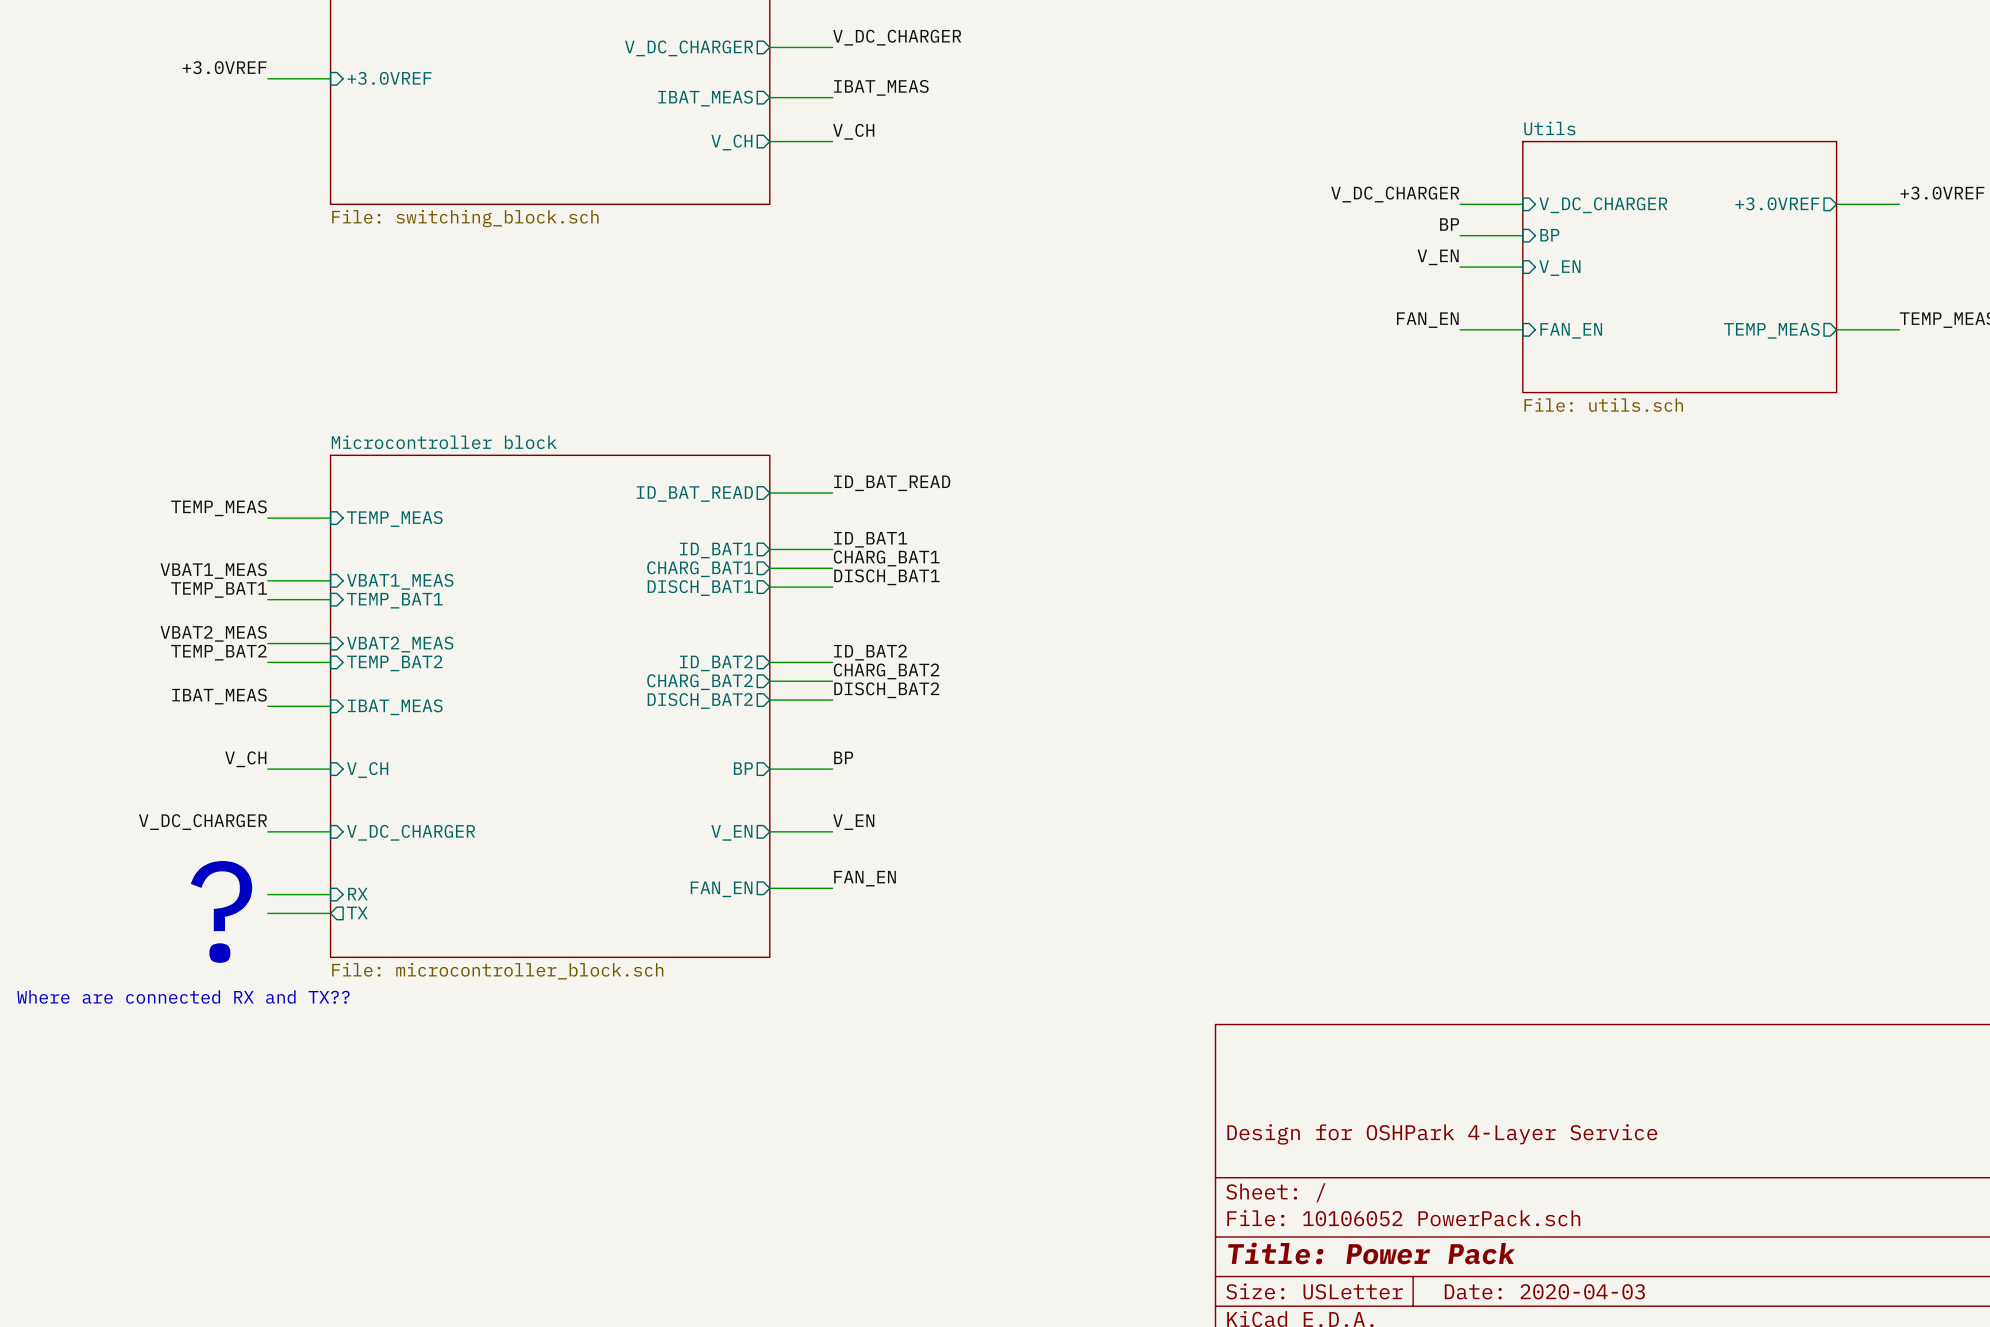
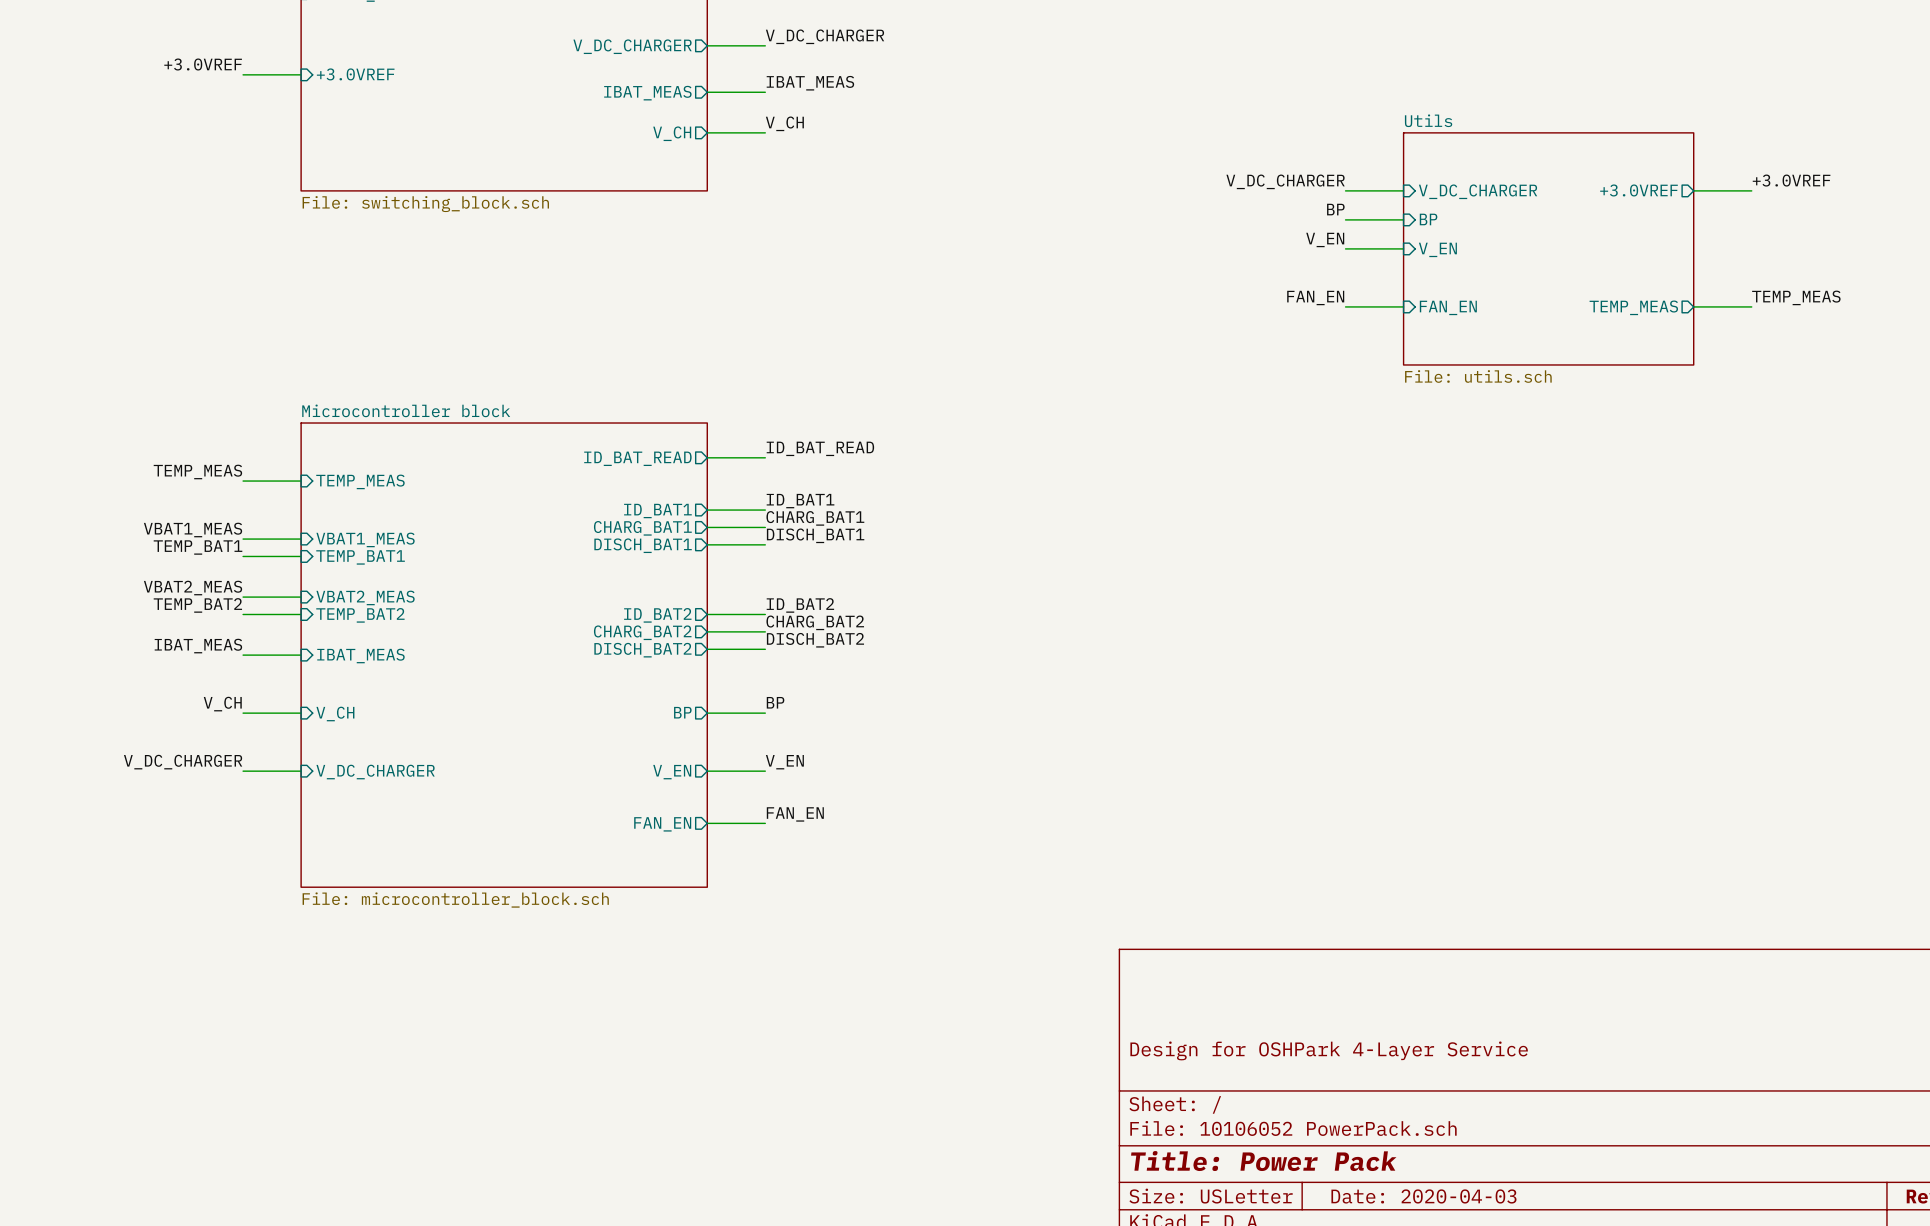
wire: (267, 894) (330, 894) -> none
sheet pin: RX (357, 894) -> none
text: ? (221, 911) -> none
sheet pin: TX (357, 912) -> none
wire: (267, 913) (330, 913) -> none
text: Where are connected RX and TX?? (183, 996) -> none

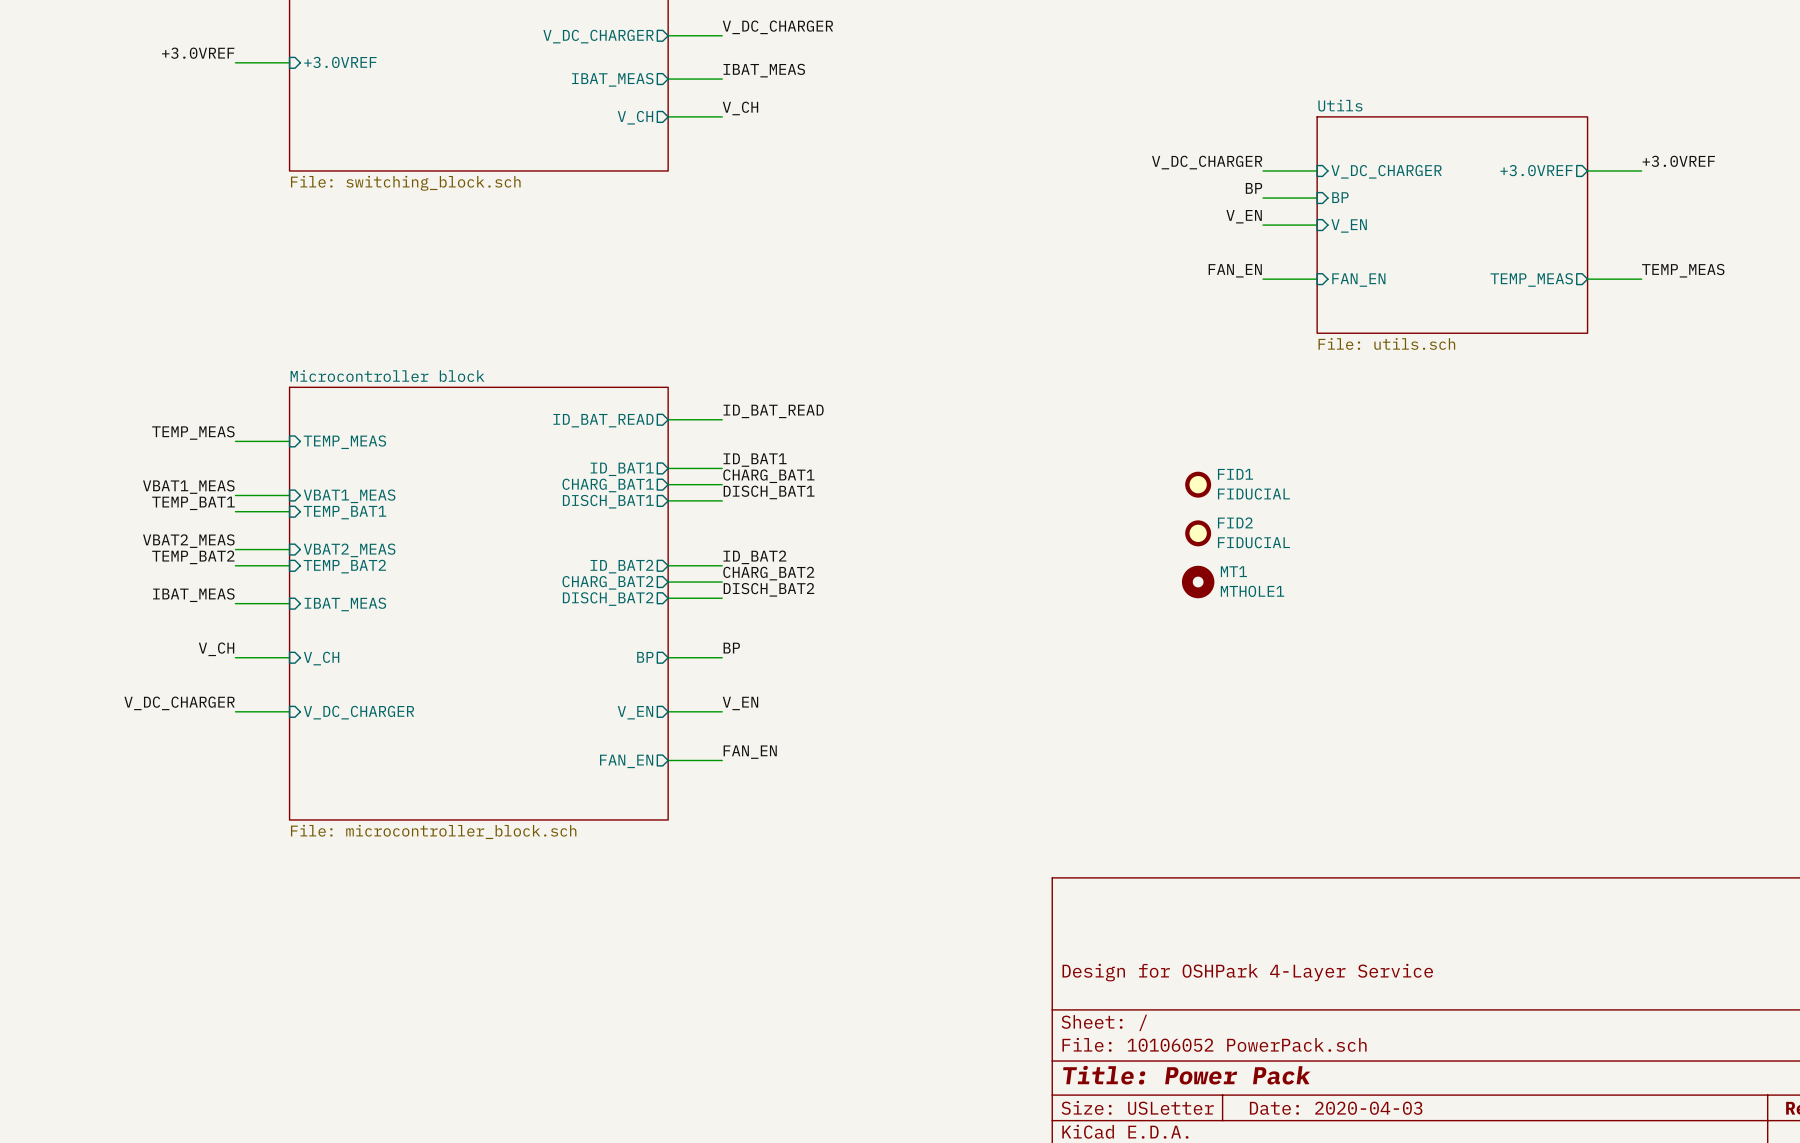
FID1: none -> FIDUCIAL (1198, 484)
FID2: none -> FIDUCIAL (1198, 533)
MT1: none -> MTHOLE1 (1198, 582)

